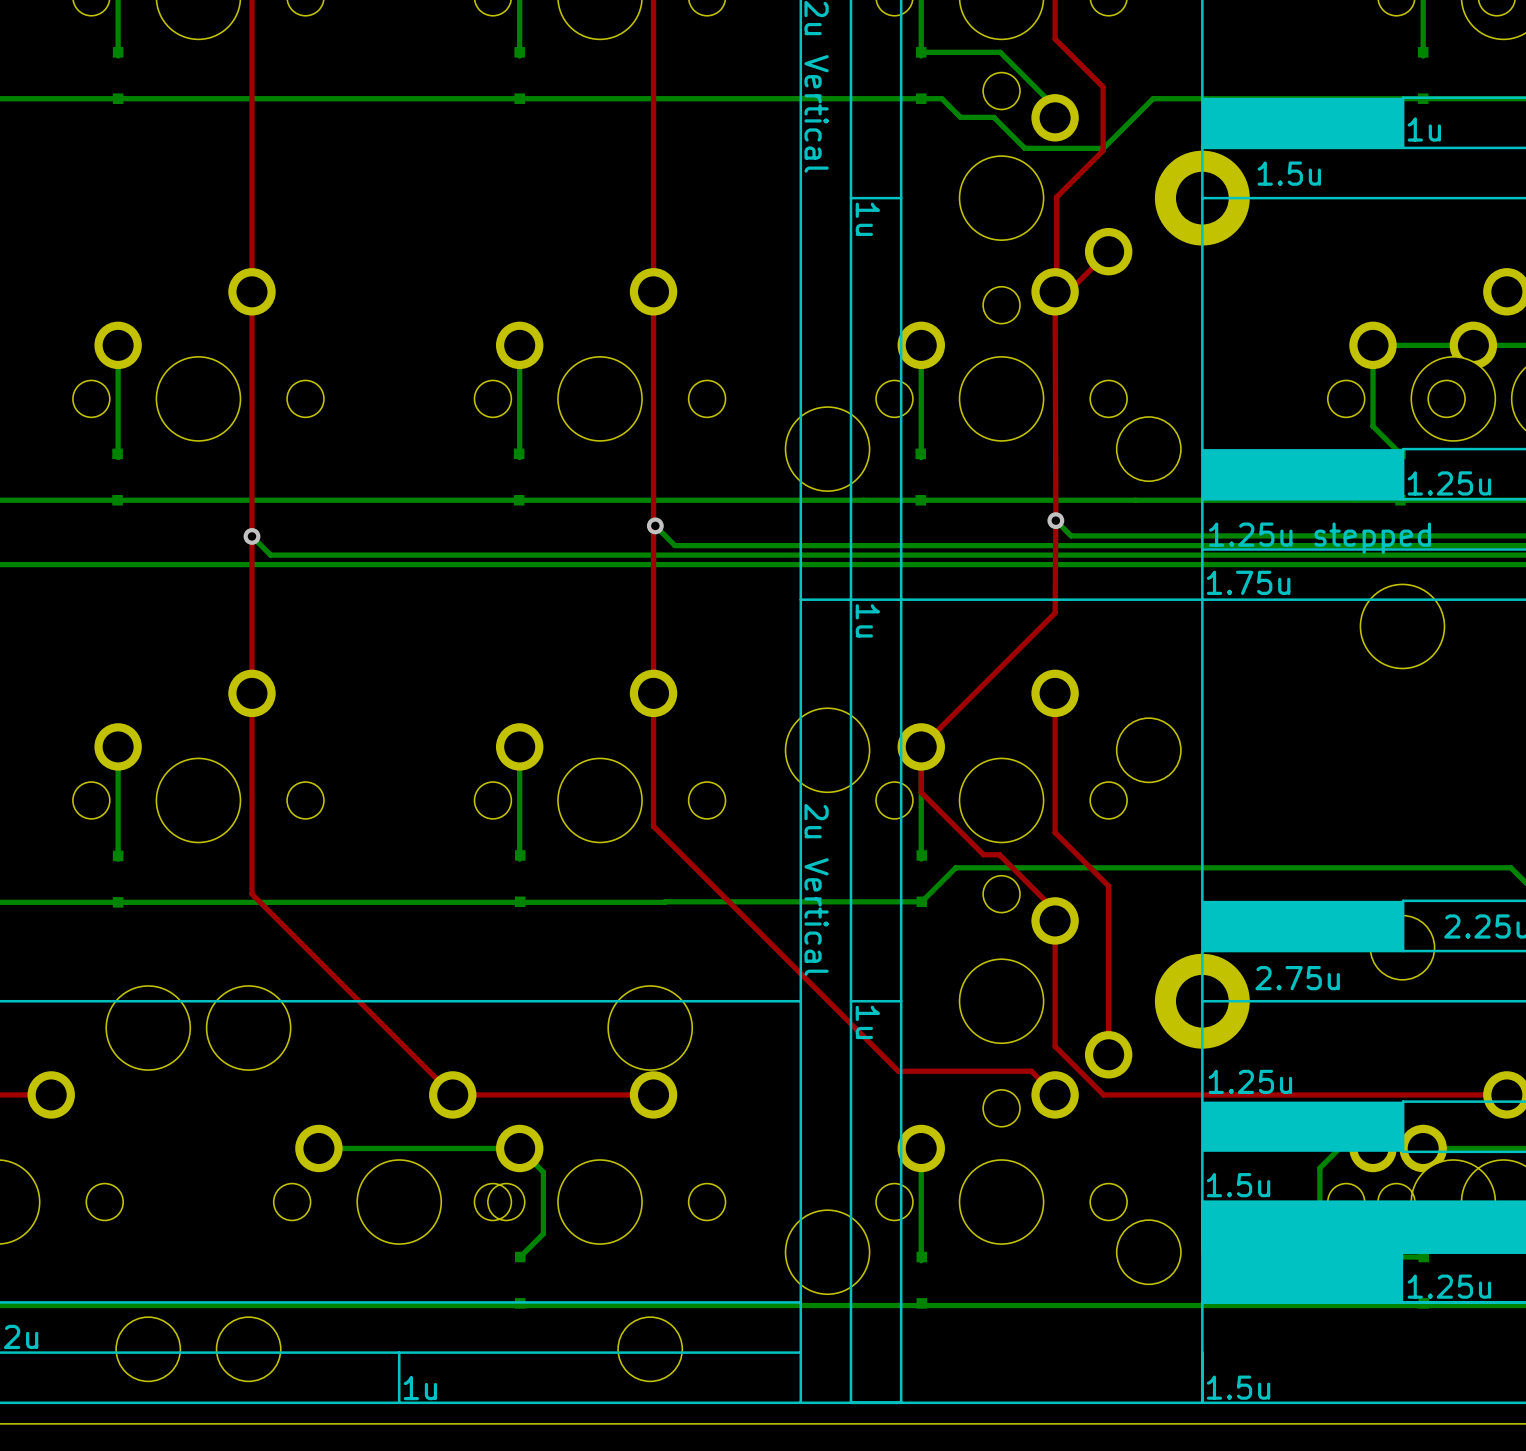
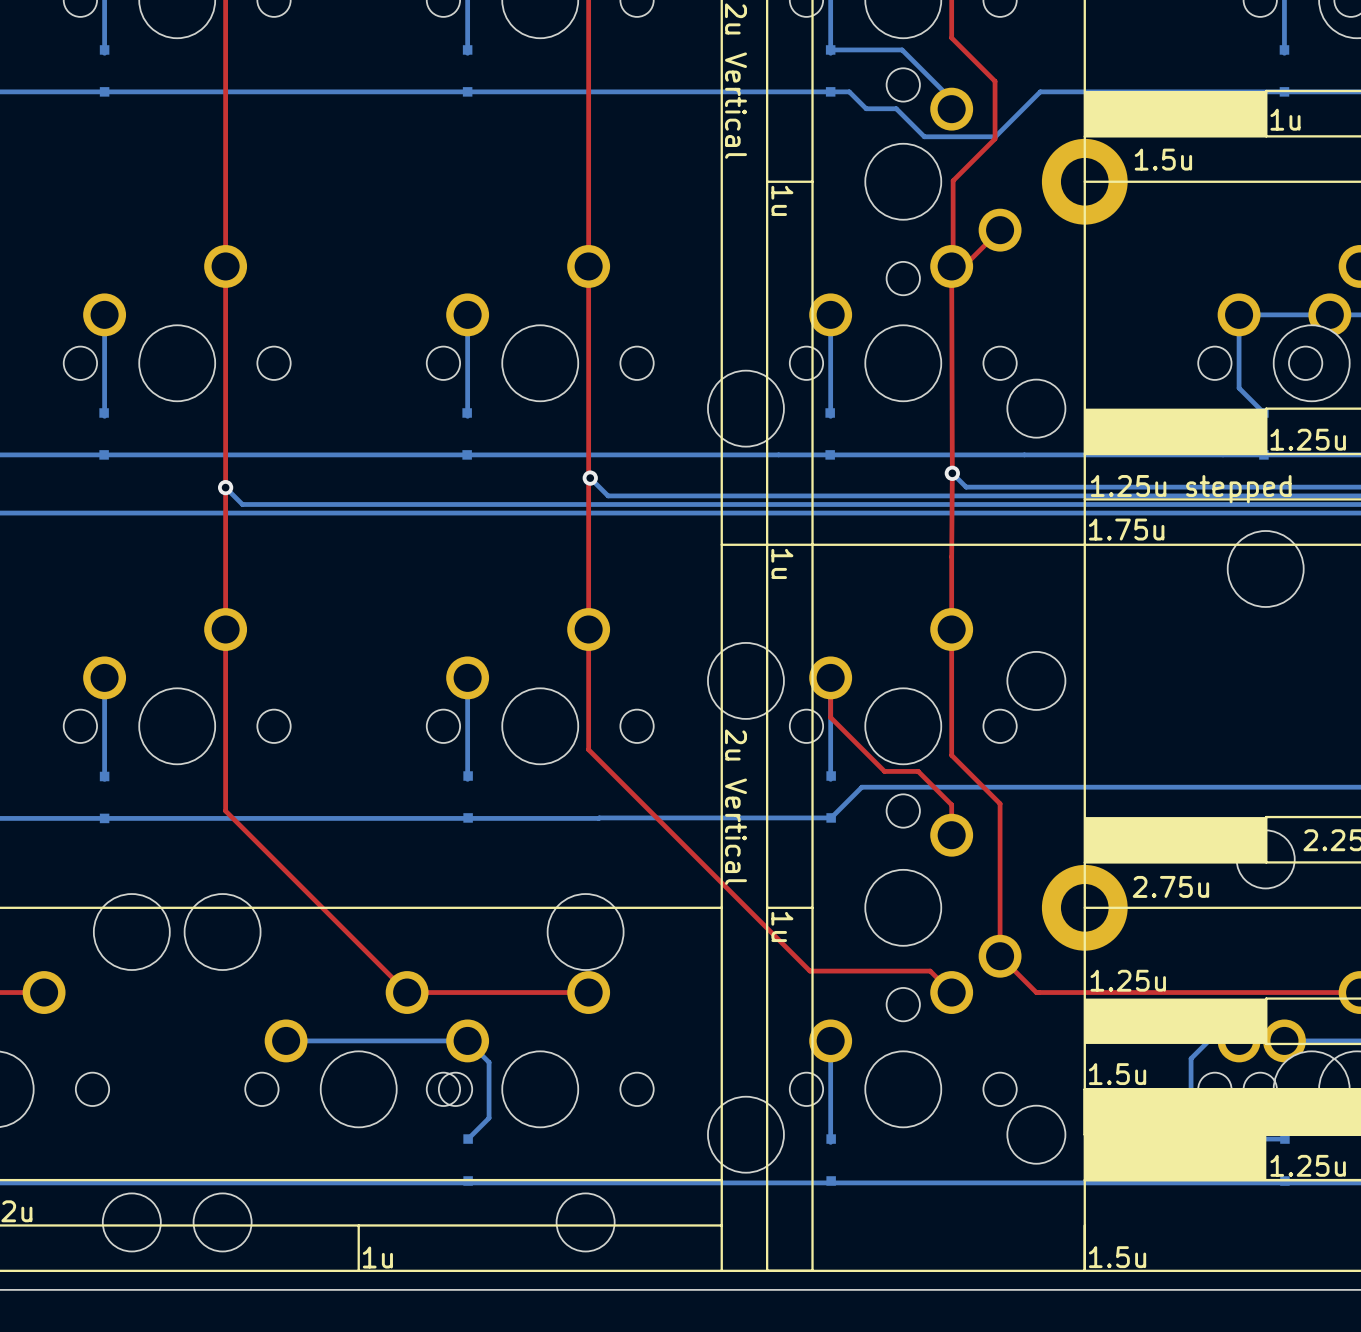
top track: (1055, 613) (921, 746) -> (951, 556) (951, 629)
top track: (921, 790) (983, 854) (999, 854) (1055, 910) -> (830, 717) (884, 771) (918, 771) (951, 804) (951, 825)
top track: (1055, 920) (1055, 1046) (1103, 1094) (1148, 1094) -> (1000, 956) (1036, 992)

